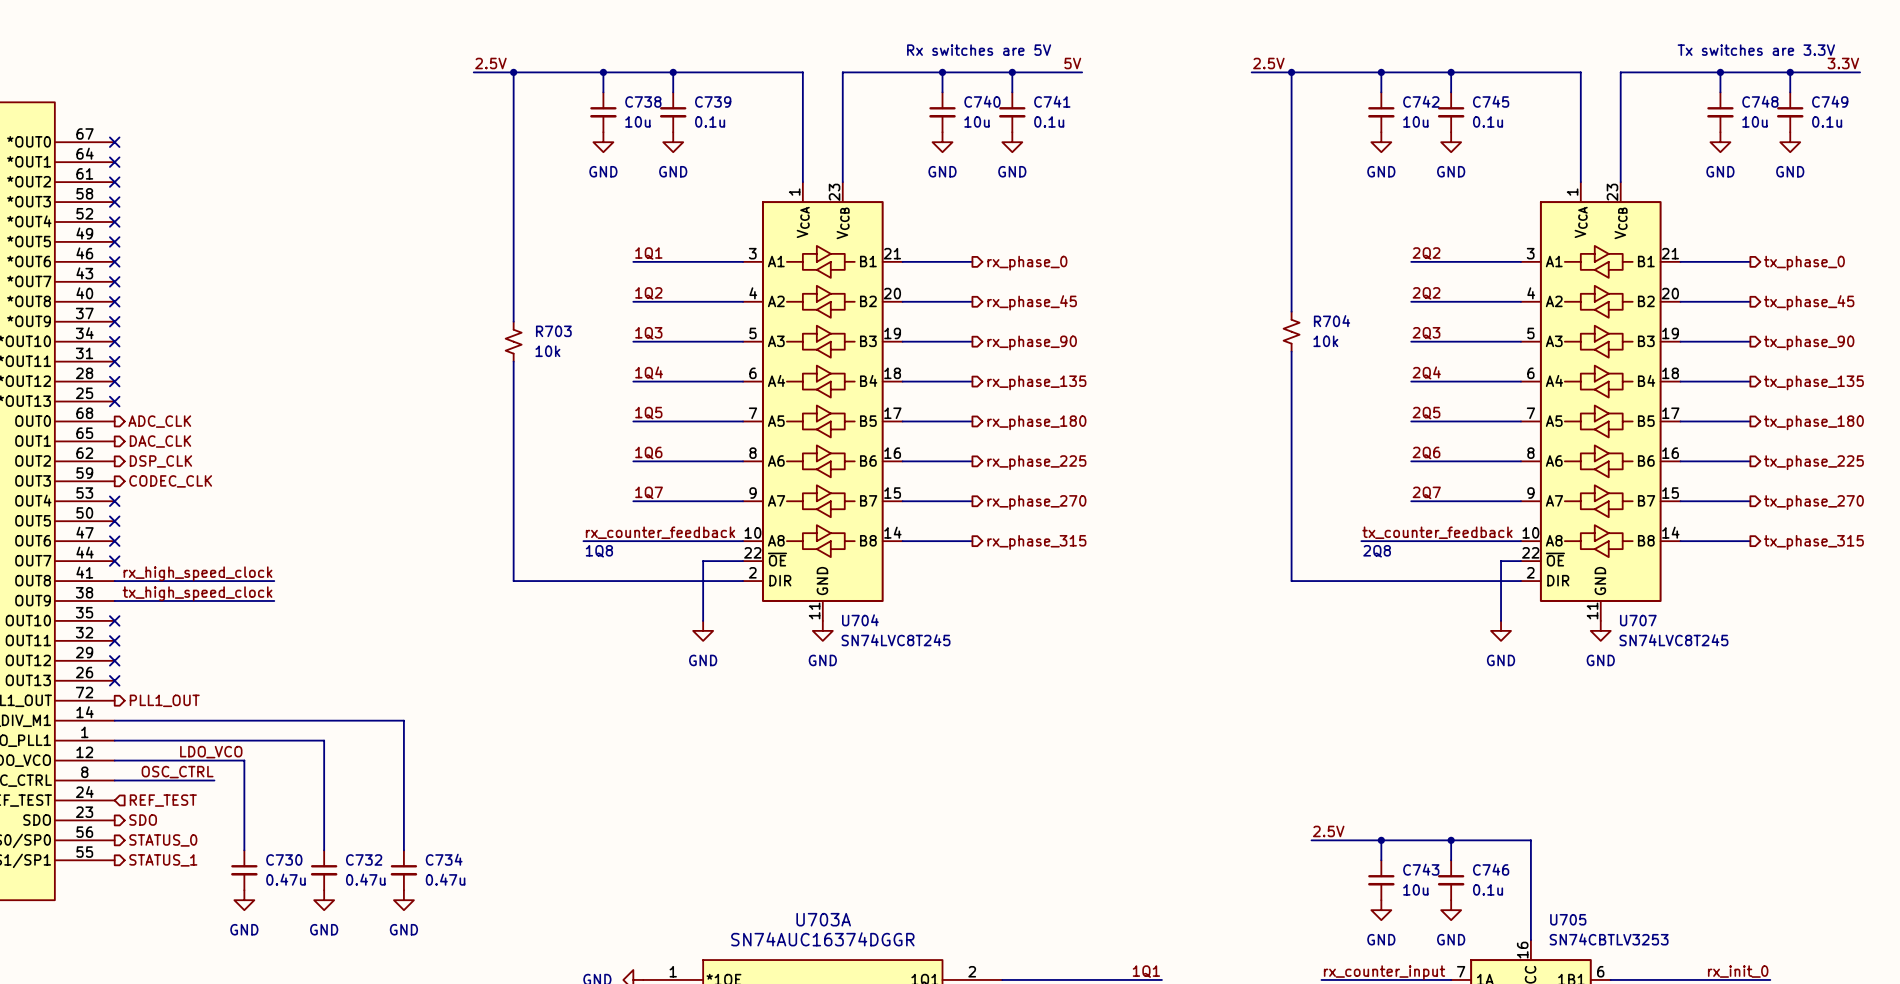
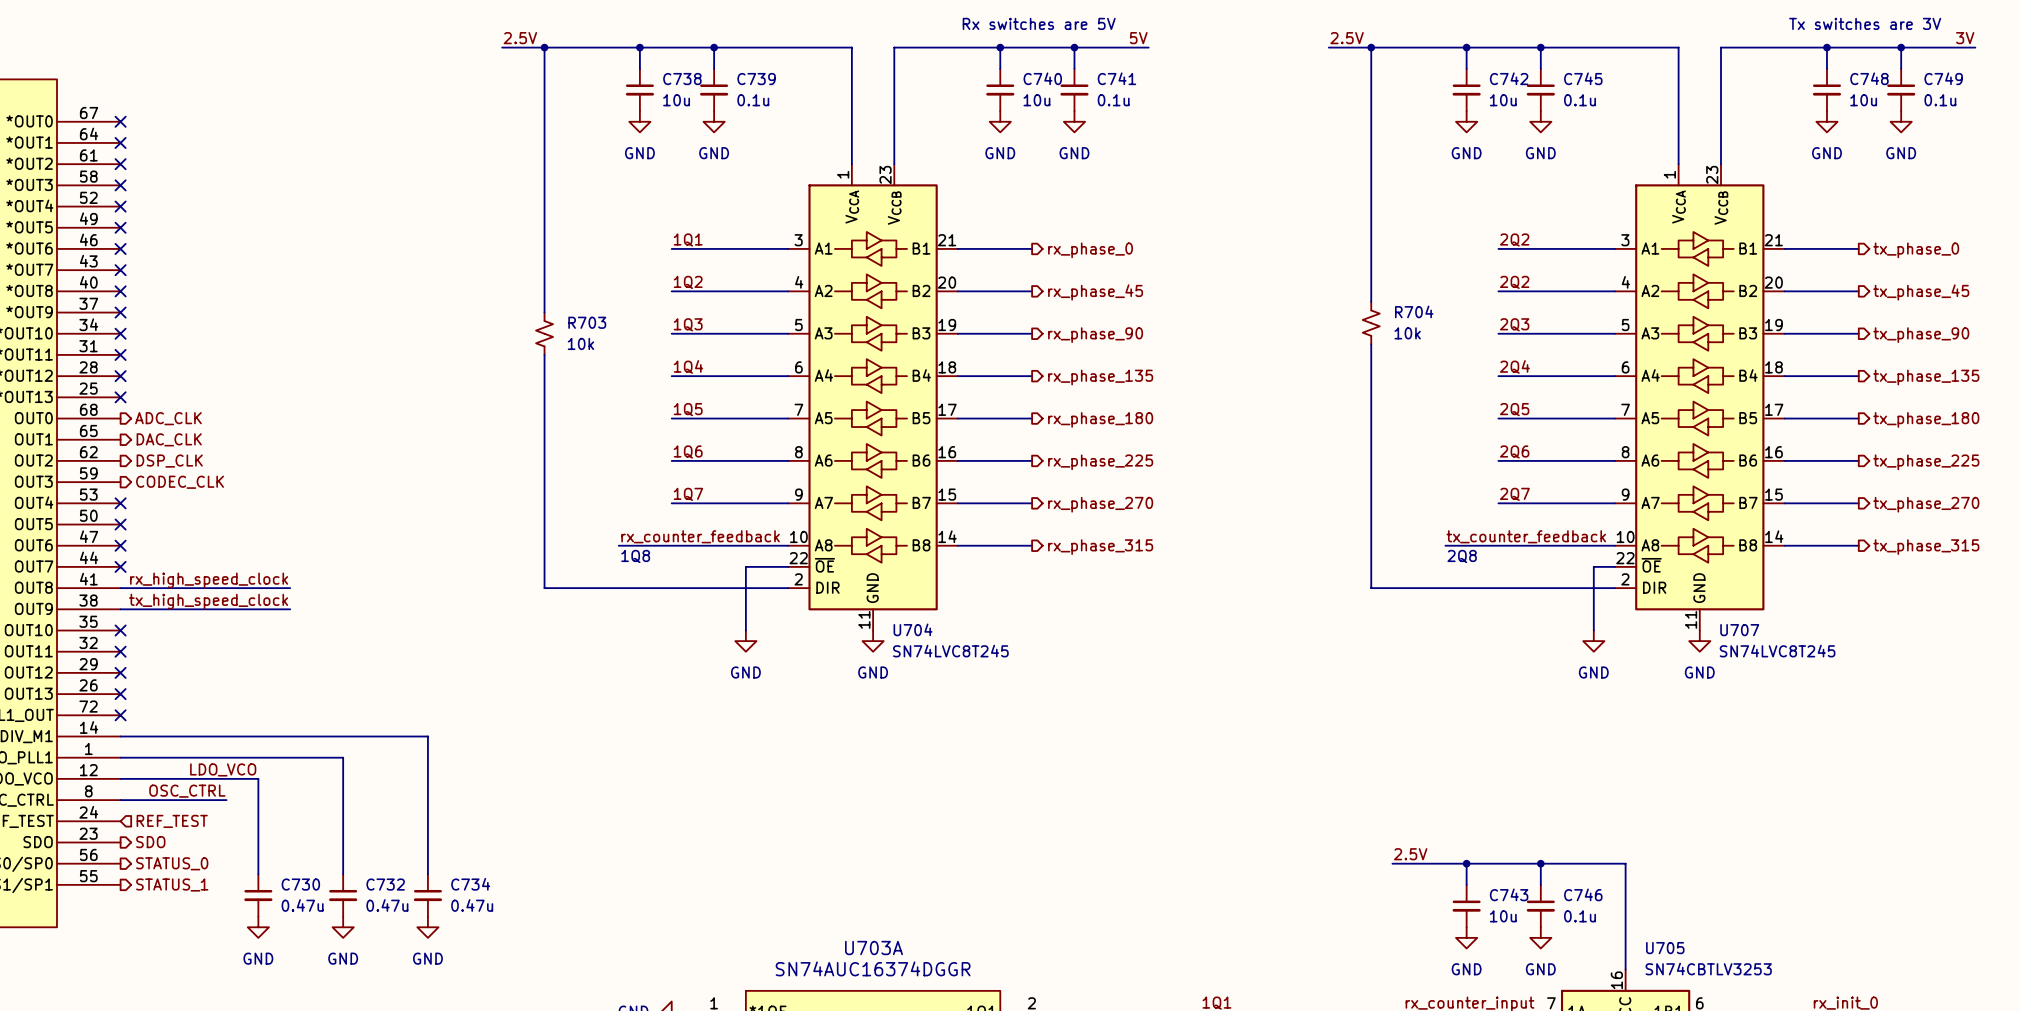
text: Tx switches are 3.3V (1756, 50) -> Tx switches are 3V (1865, 23)
label: 3.3V (1843, 63) -> 3V (1965, 38)
no-connect mark: none -> (120, 715)
hierarchical label: PLL1_OUT (164, 700) -> none

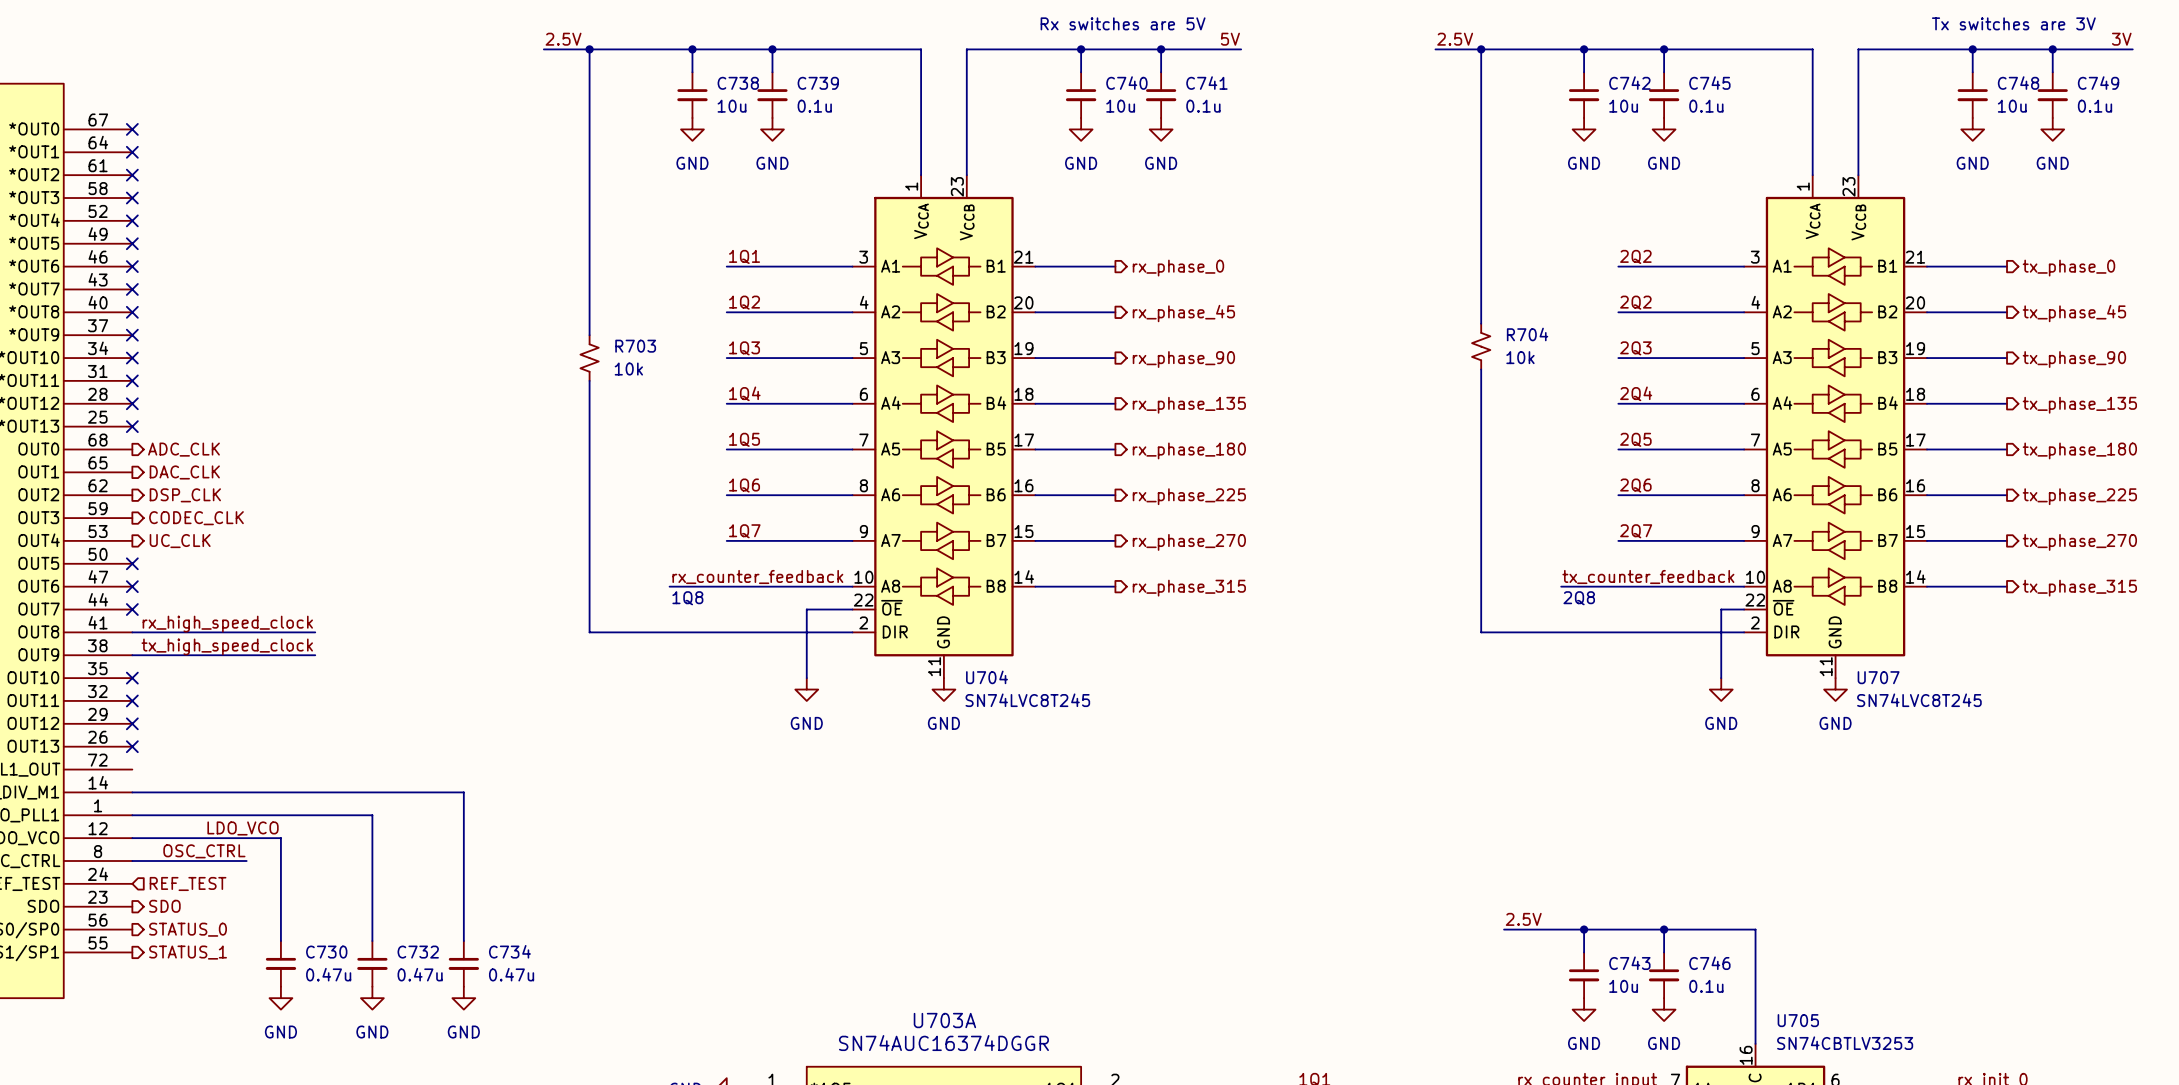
no-connect mark: (120, 503) -> none
hierarchical label: none -> UC_CLK (180, 541)
no-connect mark: (120, 715) -> none

